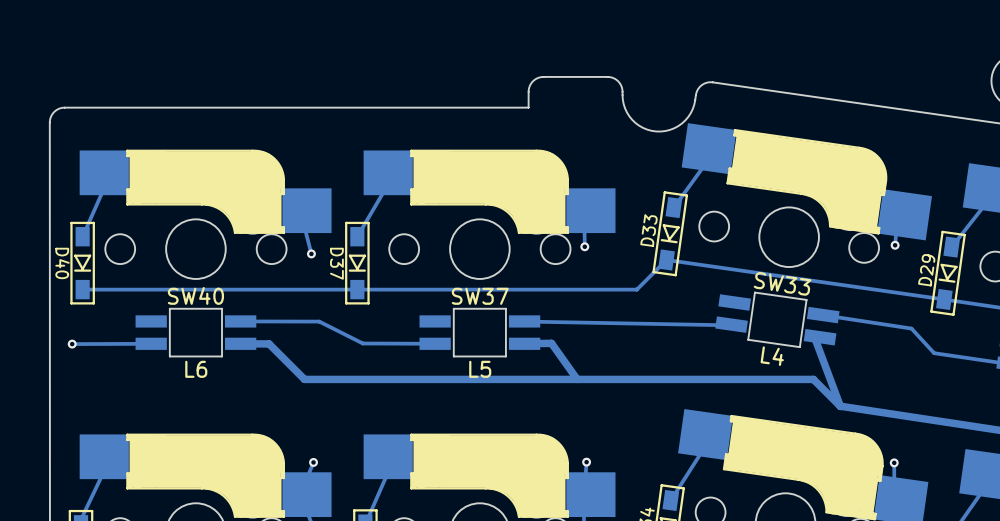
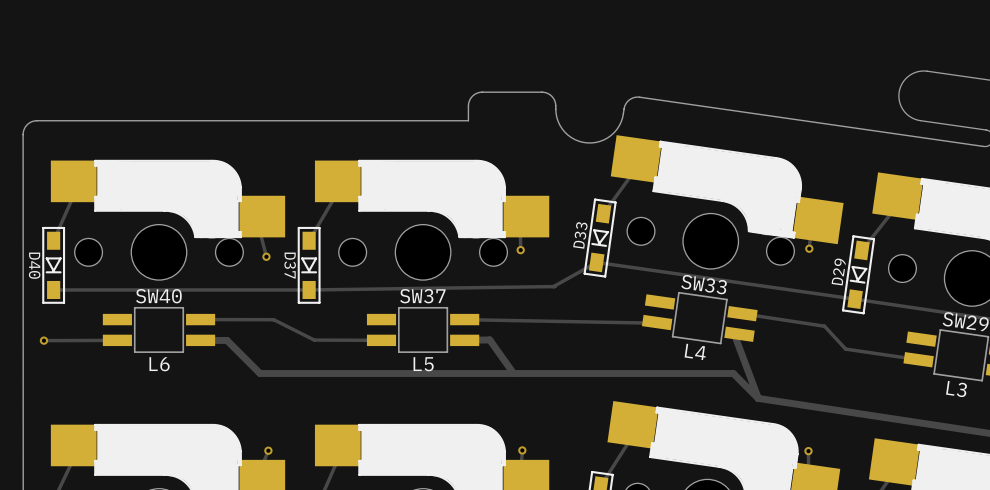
track: (666, 259) (636, 289) (357, 289) -> (555, 286) (309, 289)
track: none -> (596, 262) (553, 286)

